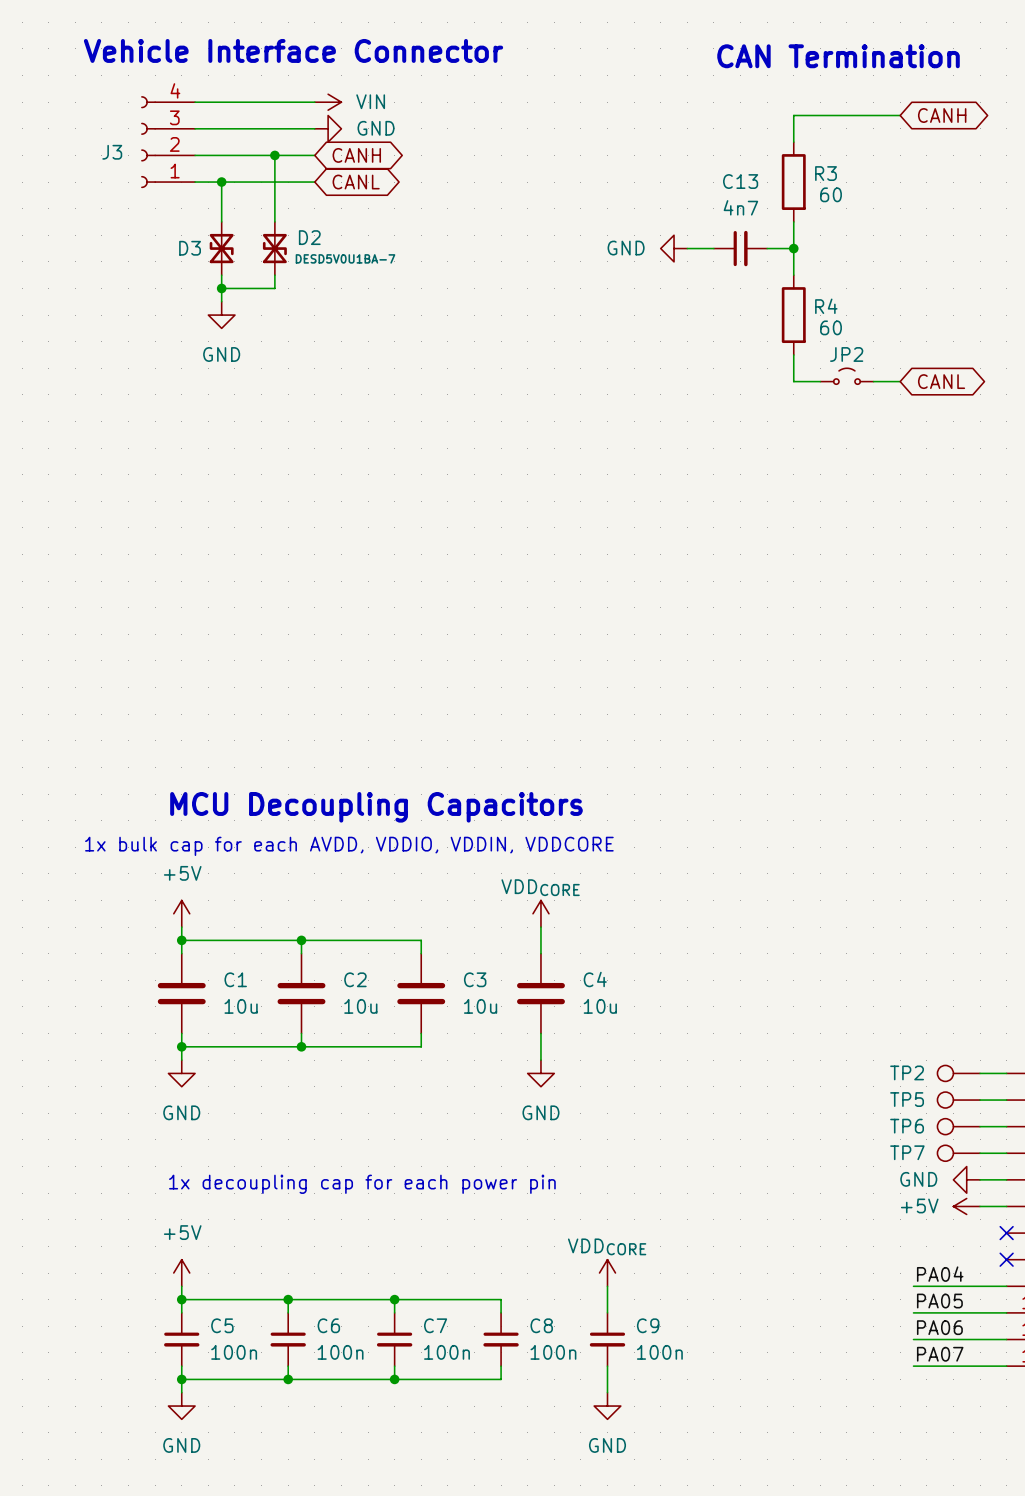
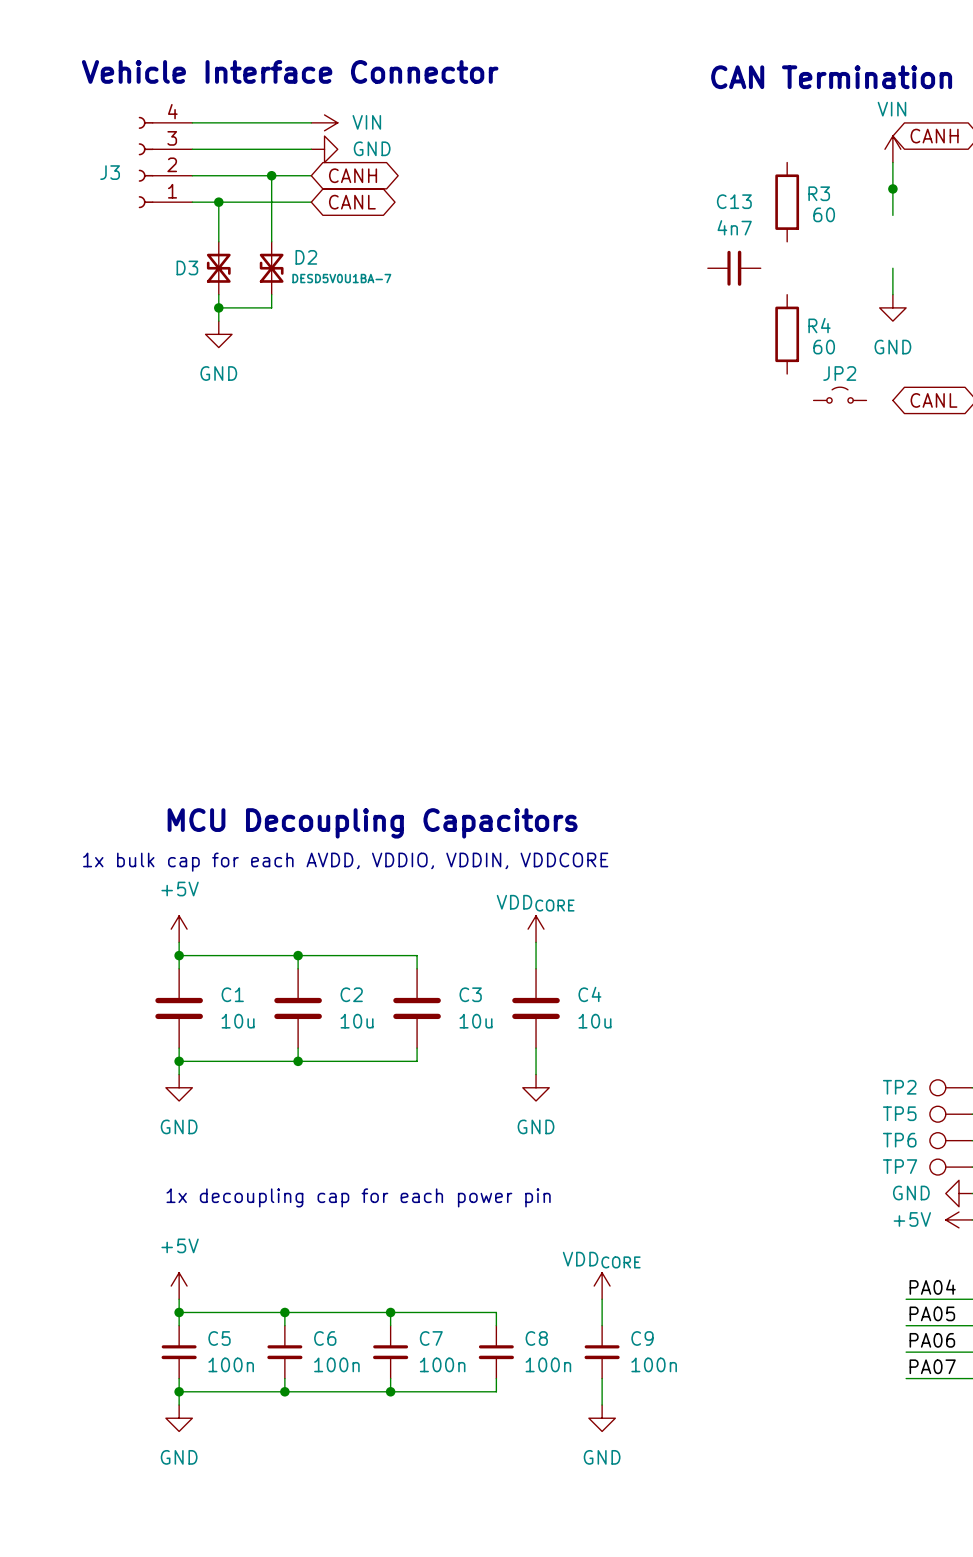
wire: (900, 115) (793, 115) (793, 142) -> none
power symbol: none -> VIN (892, 149)
junction: none -> (892, 188)
wire: (793, 221) (793, 275) -> (892, 162) (892, 215)
power symbol: GND (674, 248) -> none
wire: (687, 248) (713, 248) -> none
wire: (767, 248) (793, 248) -> none
junction: (793, 248) -> none
wire: none -> (892, 268) (892, 294)
power symbol: none -> GND (892, 307)
wire: (793, 354) (793, 381) (820, 381) -> none
wire: (873, 381) (900, 381) -> none

